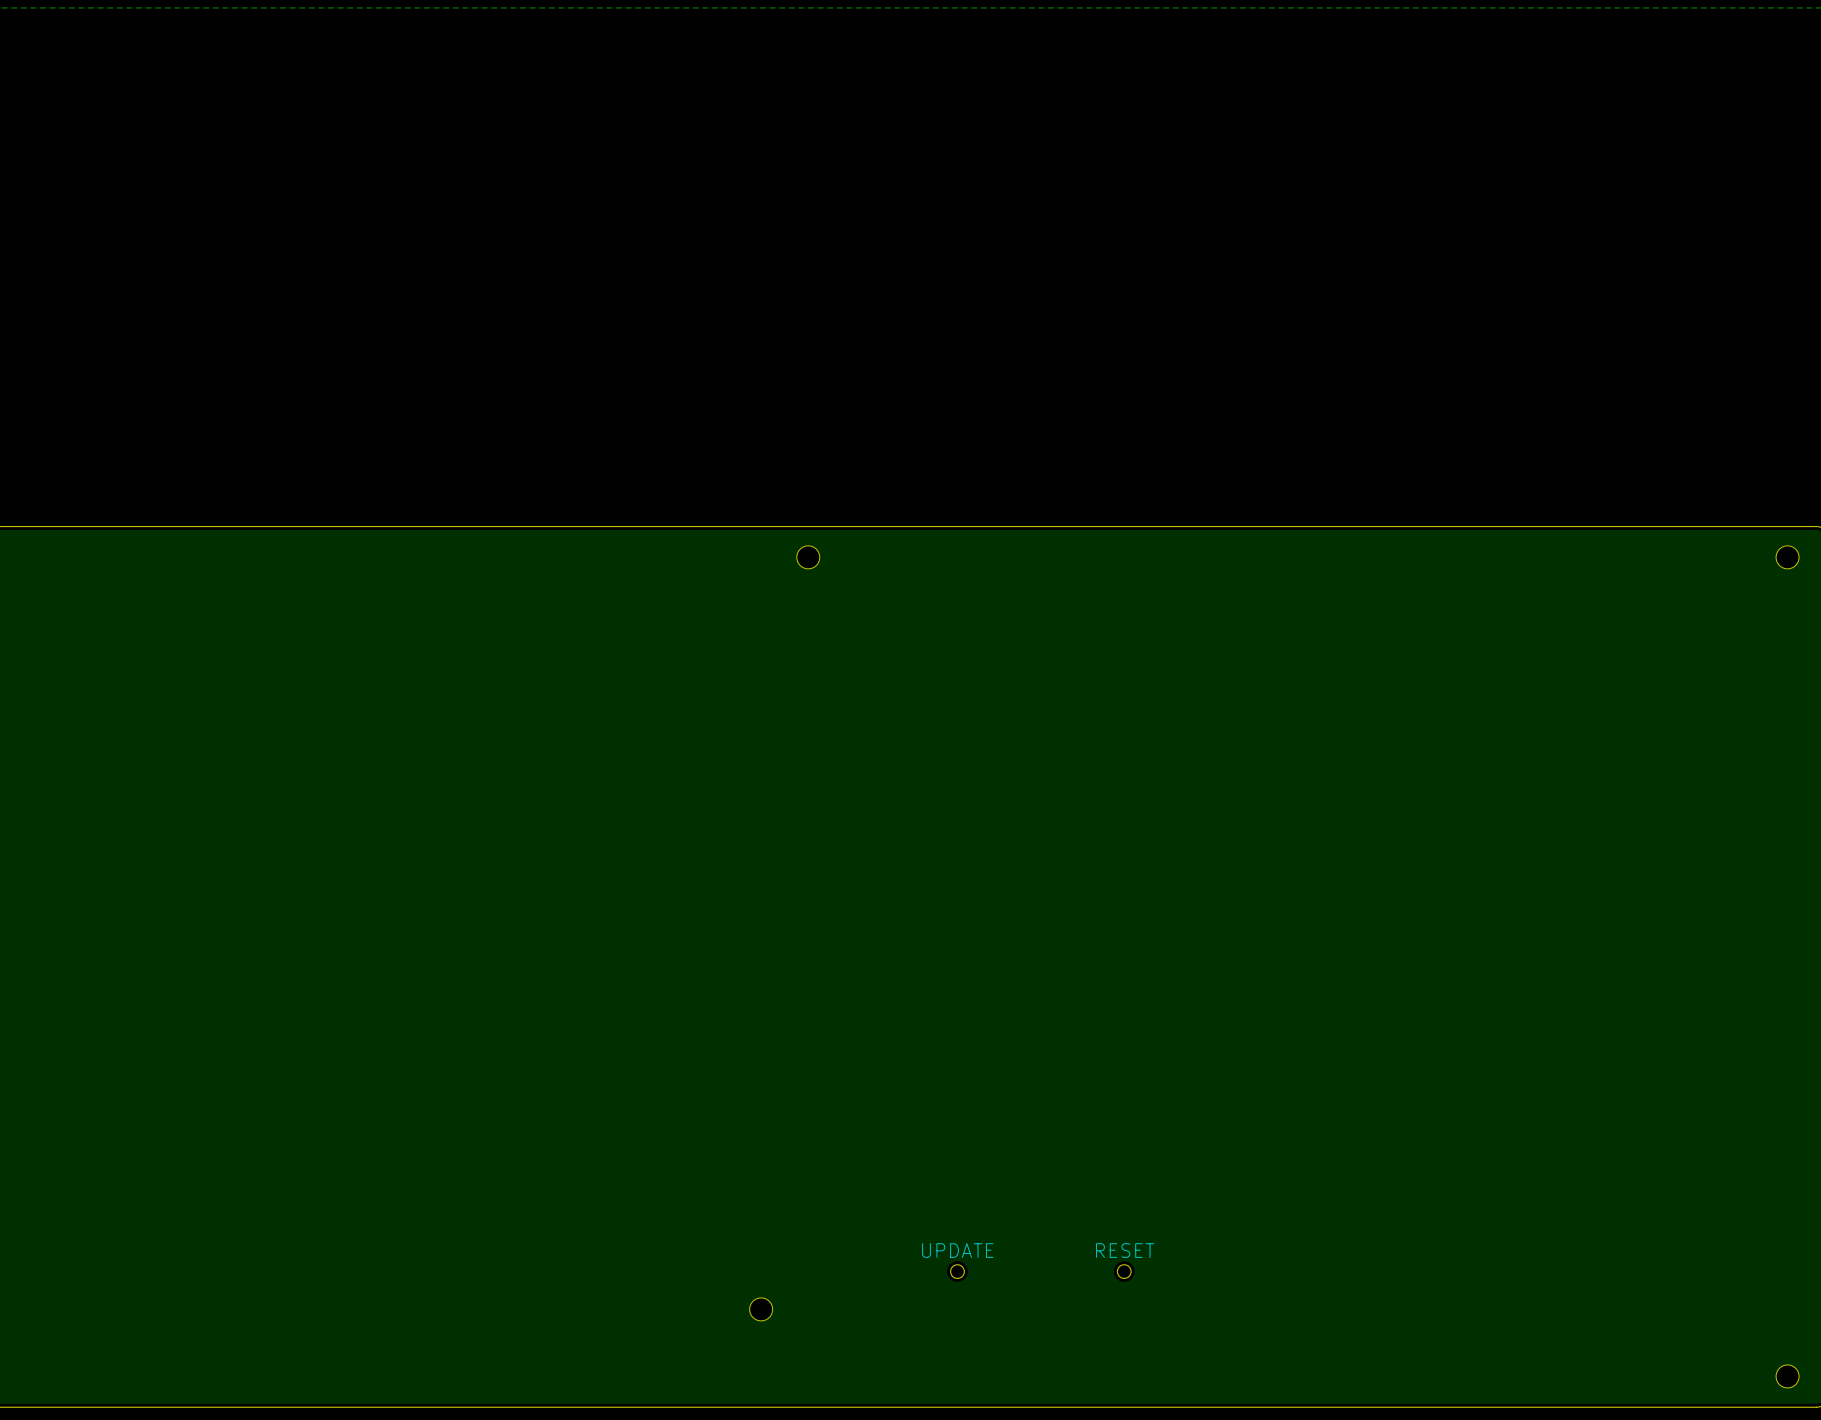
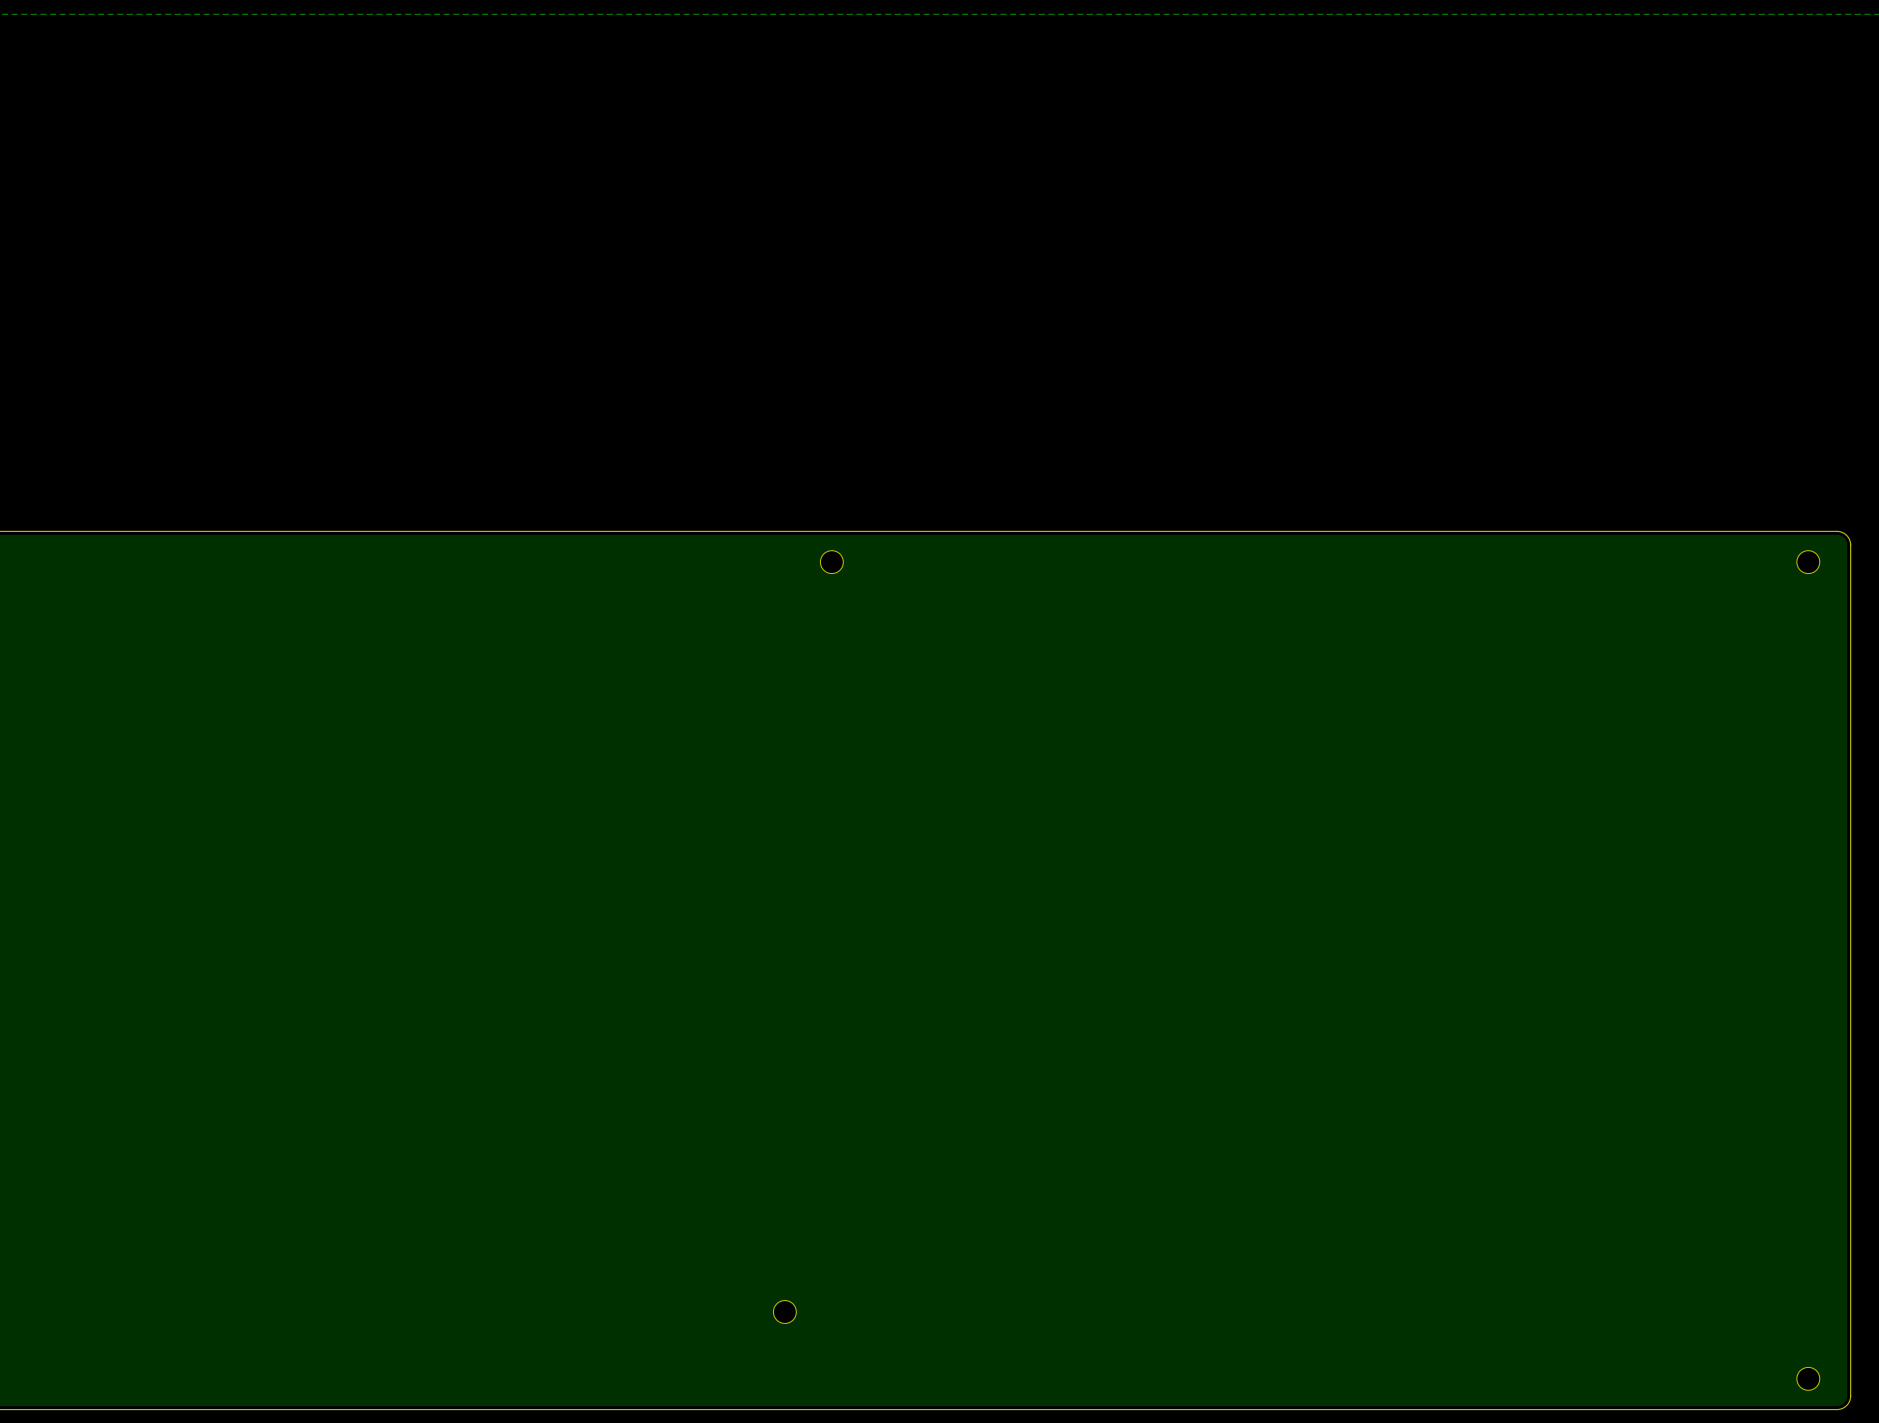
text: UPDATE (957, 1250) -> none
text: RESET (1125, 1250) -> none
round board edge: [950, 1264, 965, 1279] -> none
round board edge: [1116, 1264, 1132, 1279] -> none

